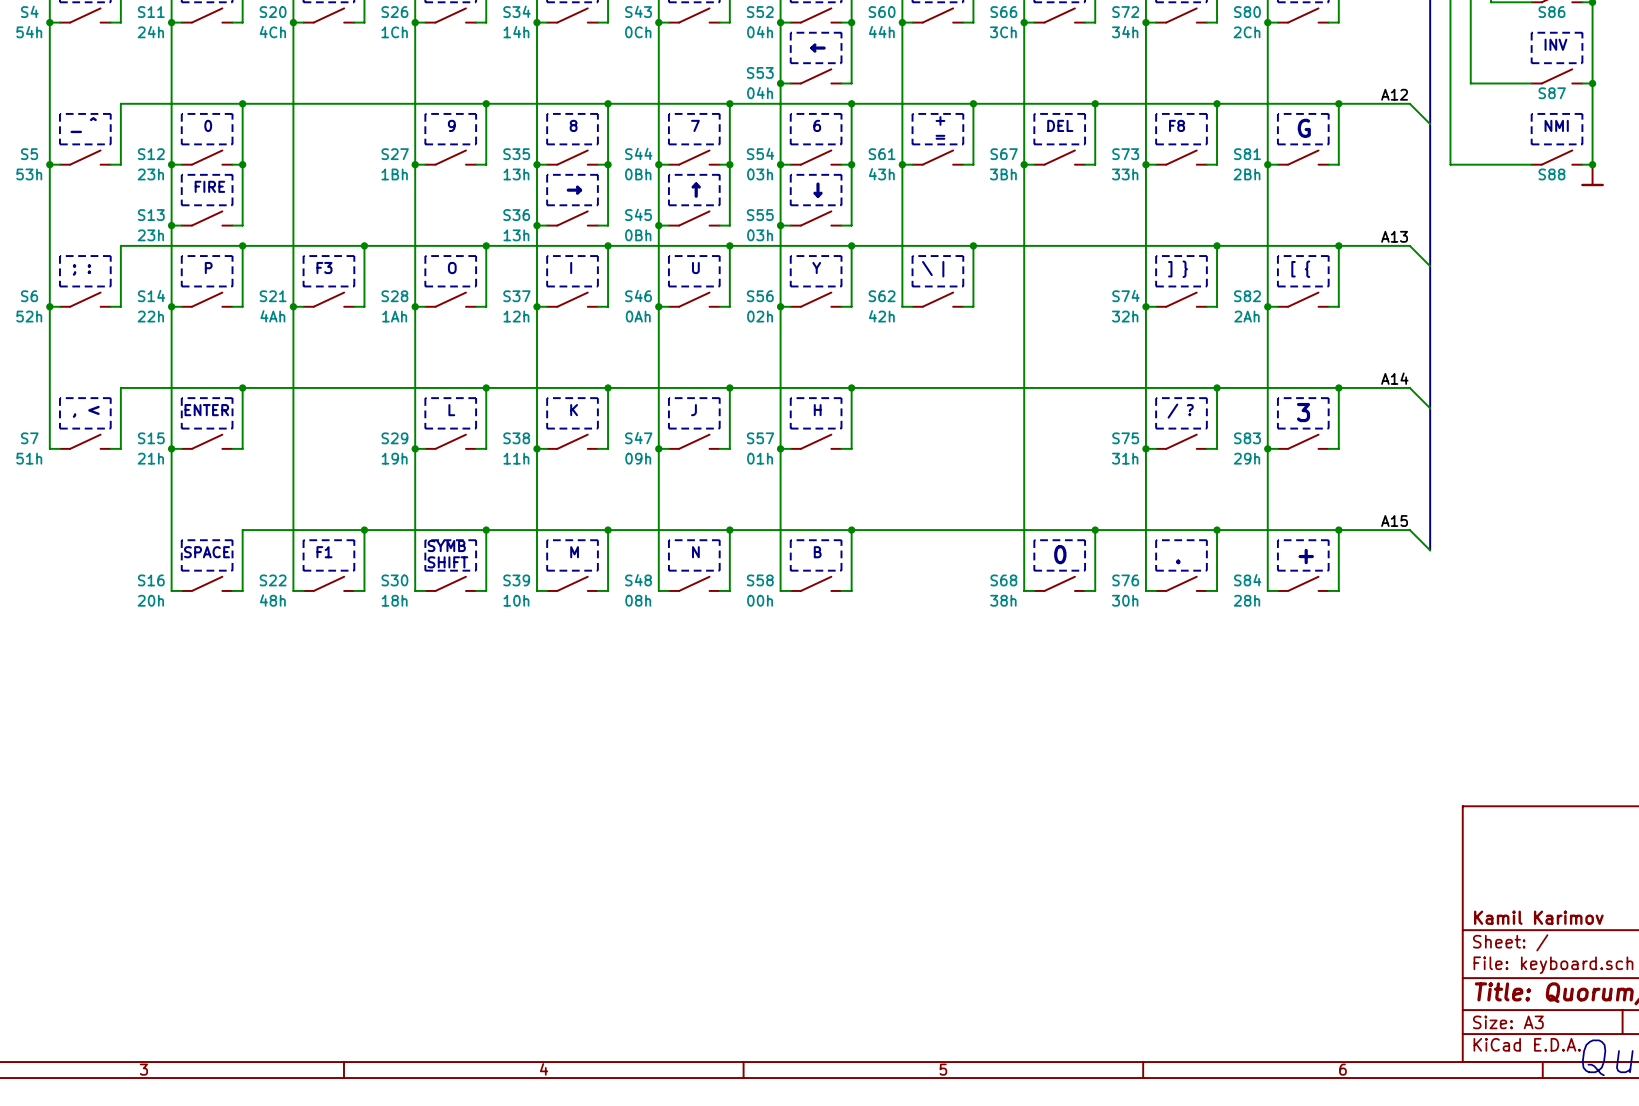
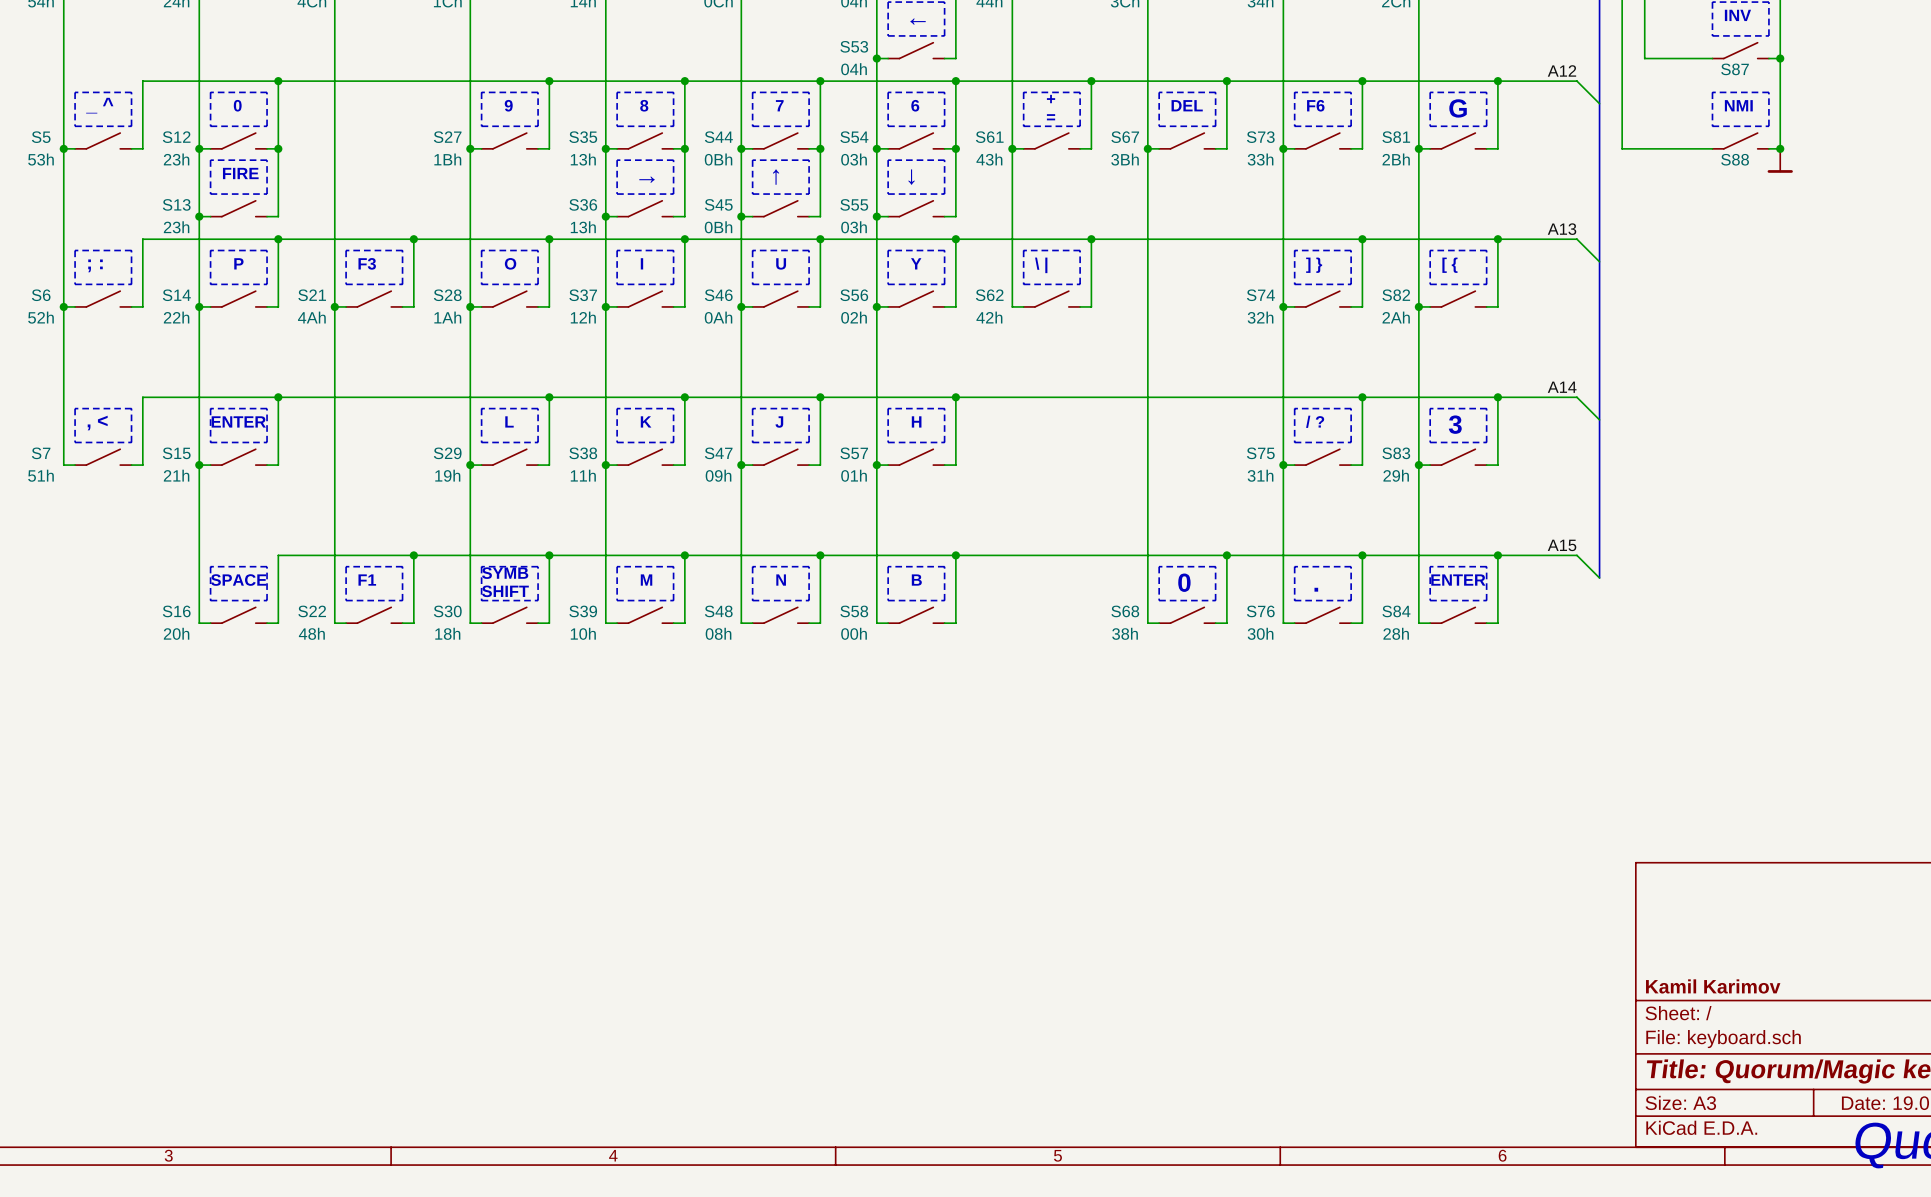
text: F8 (1177, 125) -> F6 (1315, 105)
text: none -> ENTER (1458, 580)
text: + (1306, 556) -> none

